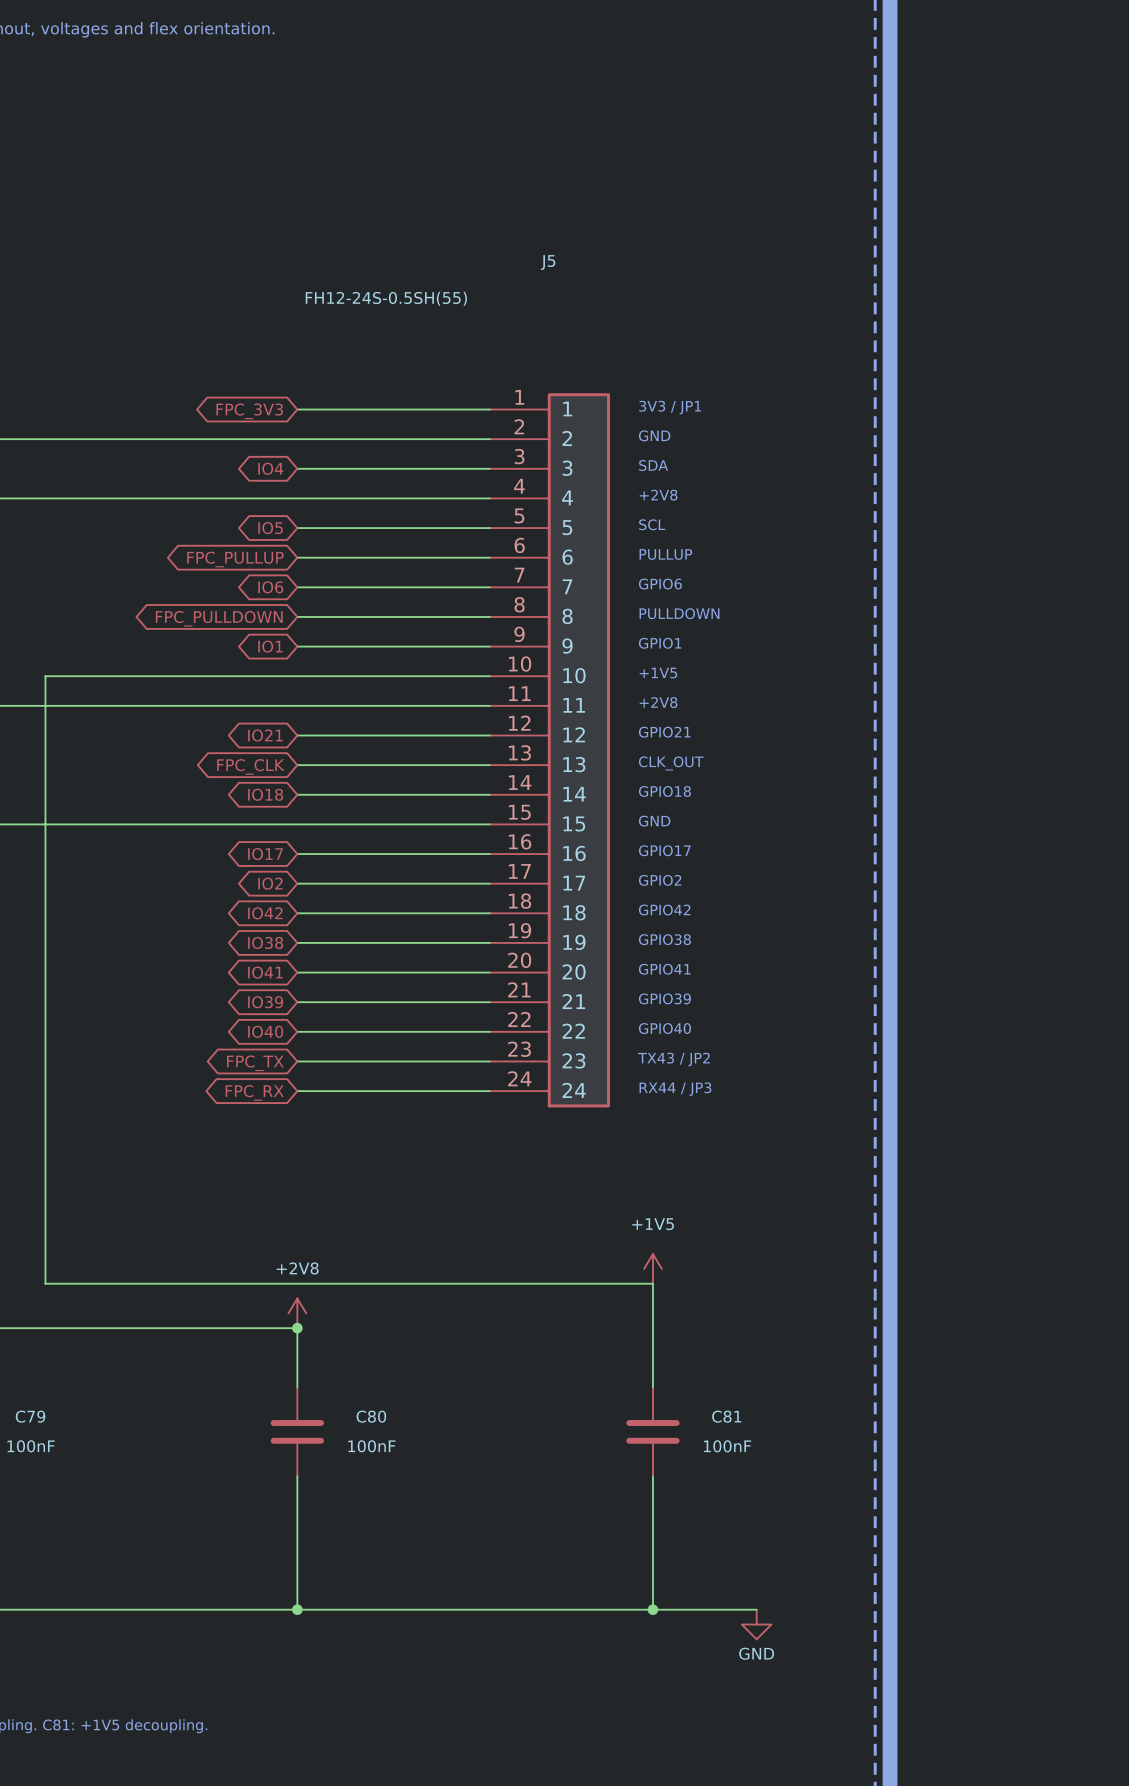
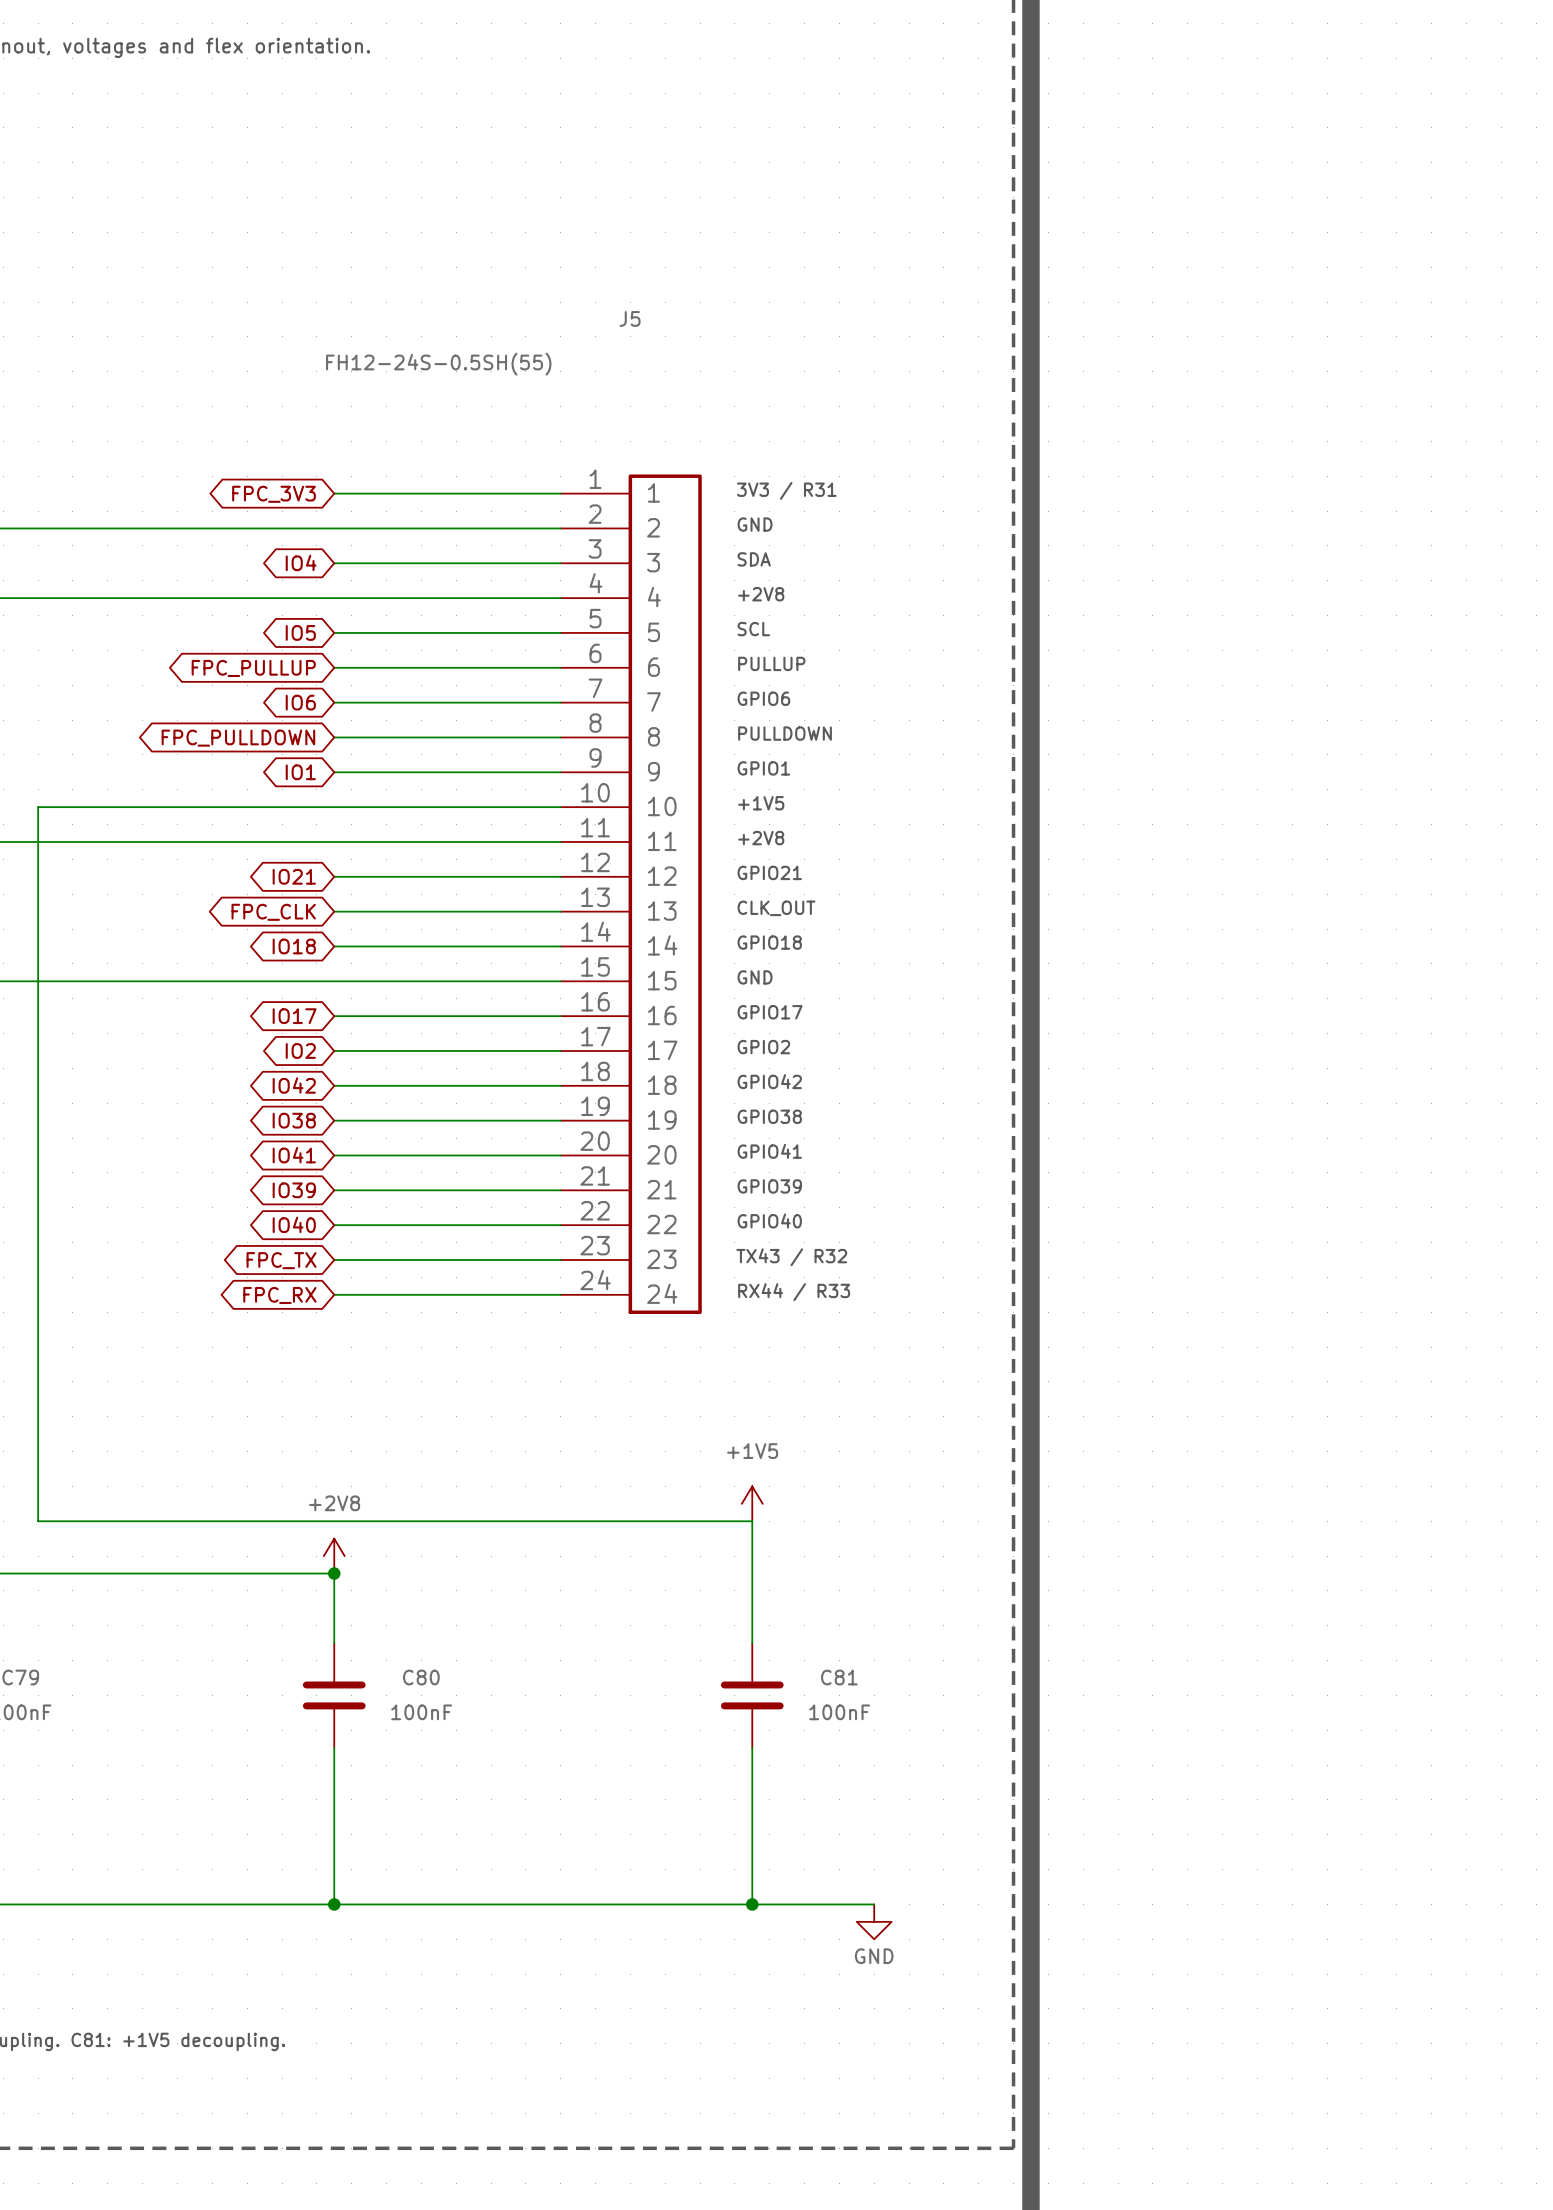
text: 3V3 / JP1 (670, 407) -> 3V3 / R31 (786, 490)
text: TX43 / JP2 (673, 1059) -> TX43 / R32 (791, 1257)
text: RX44 / JP3 (675, 1089) -> RX44 / R33 (794, 1292)

